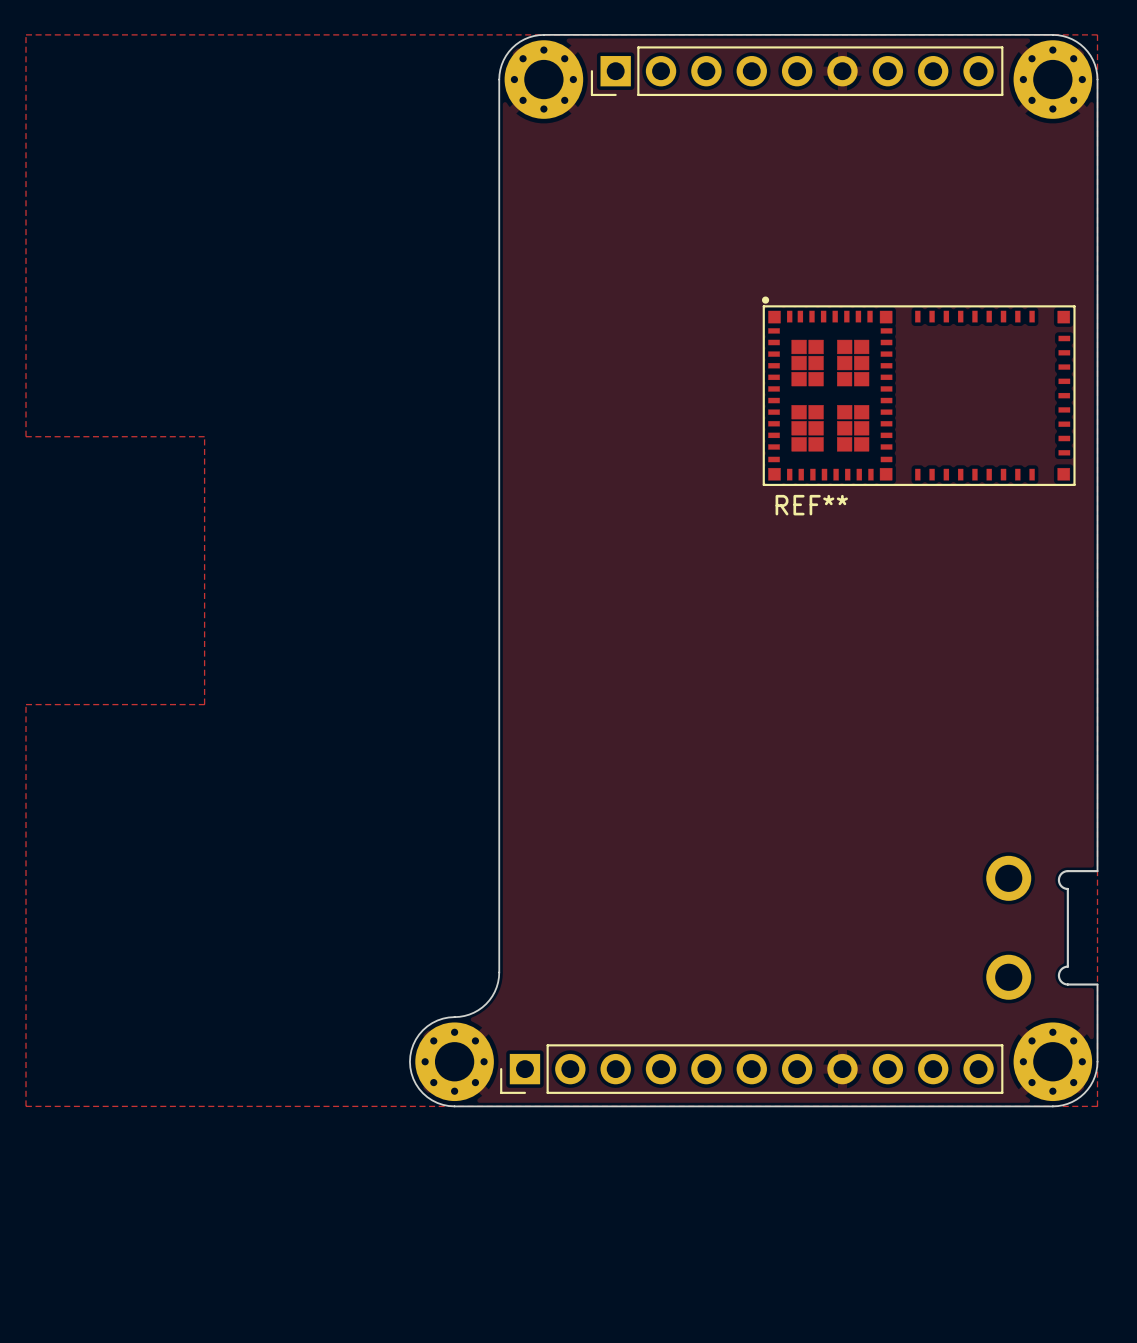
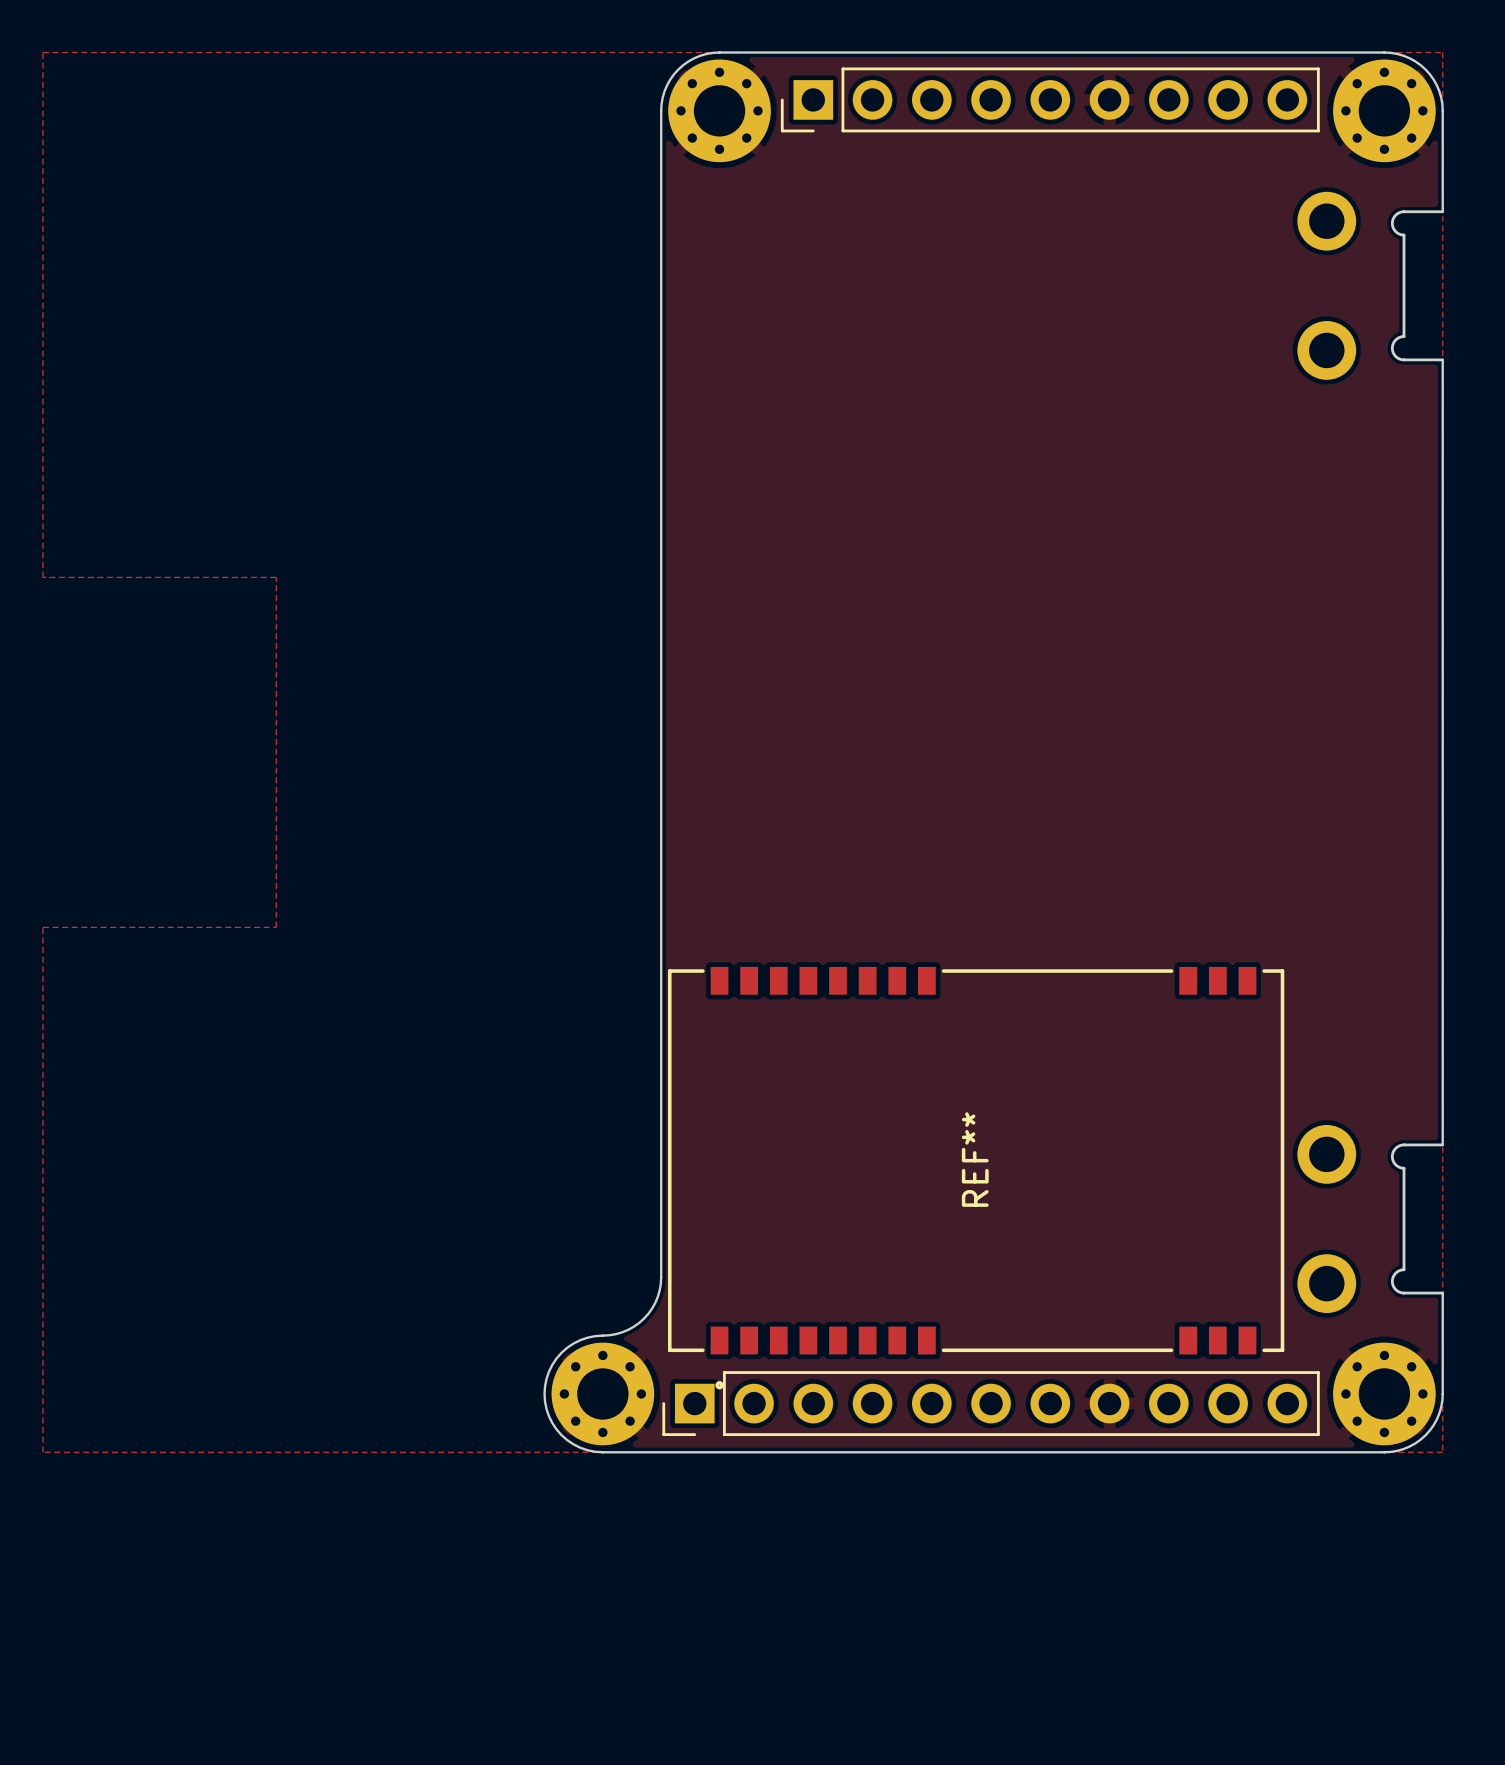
board edge: (1097, 156) (1097, 270) -> none
part: none -> (1370, 285)
REF**: (918, 391) -> none
REF**: none -> (976, 1178)

